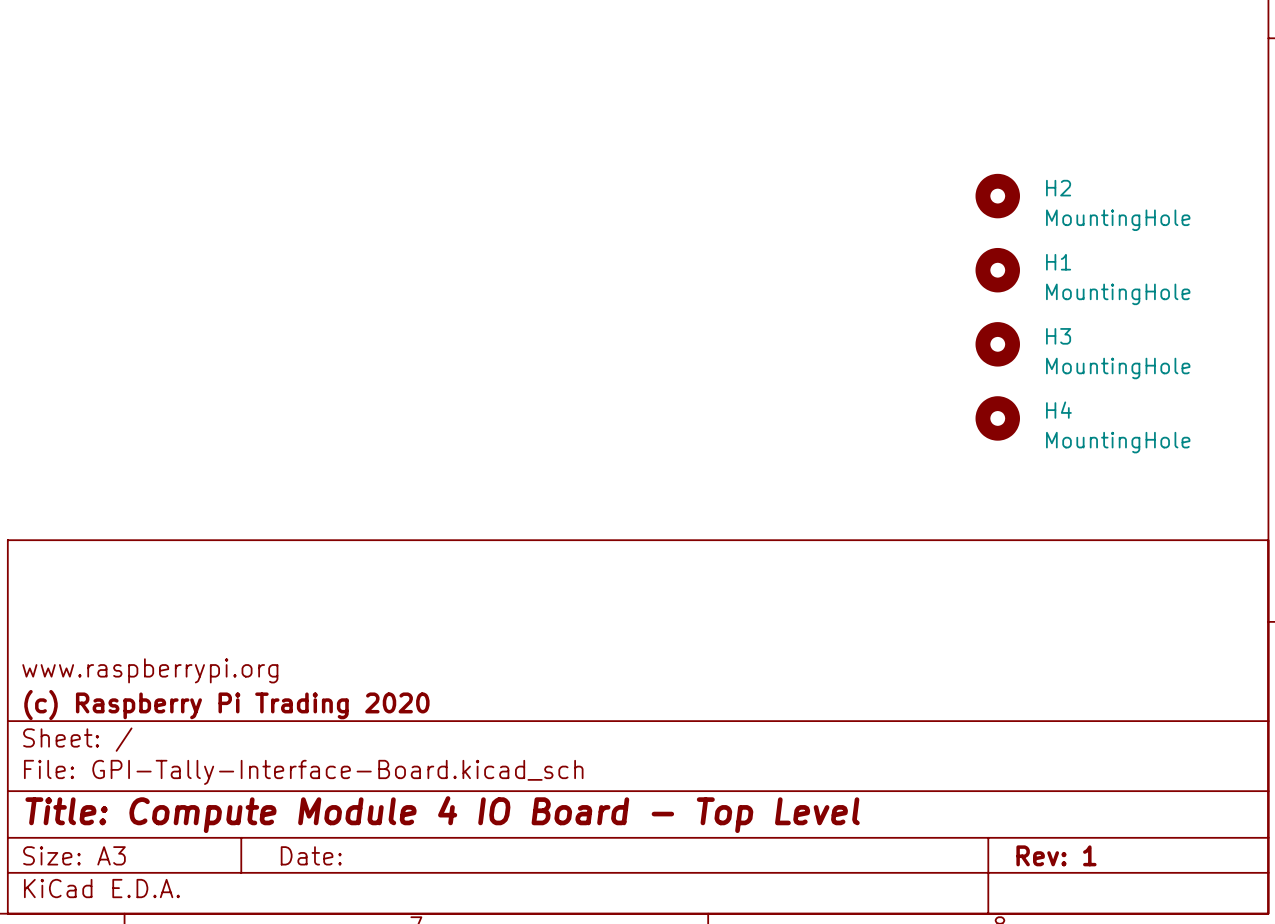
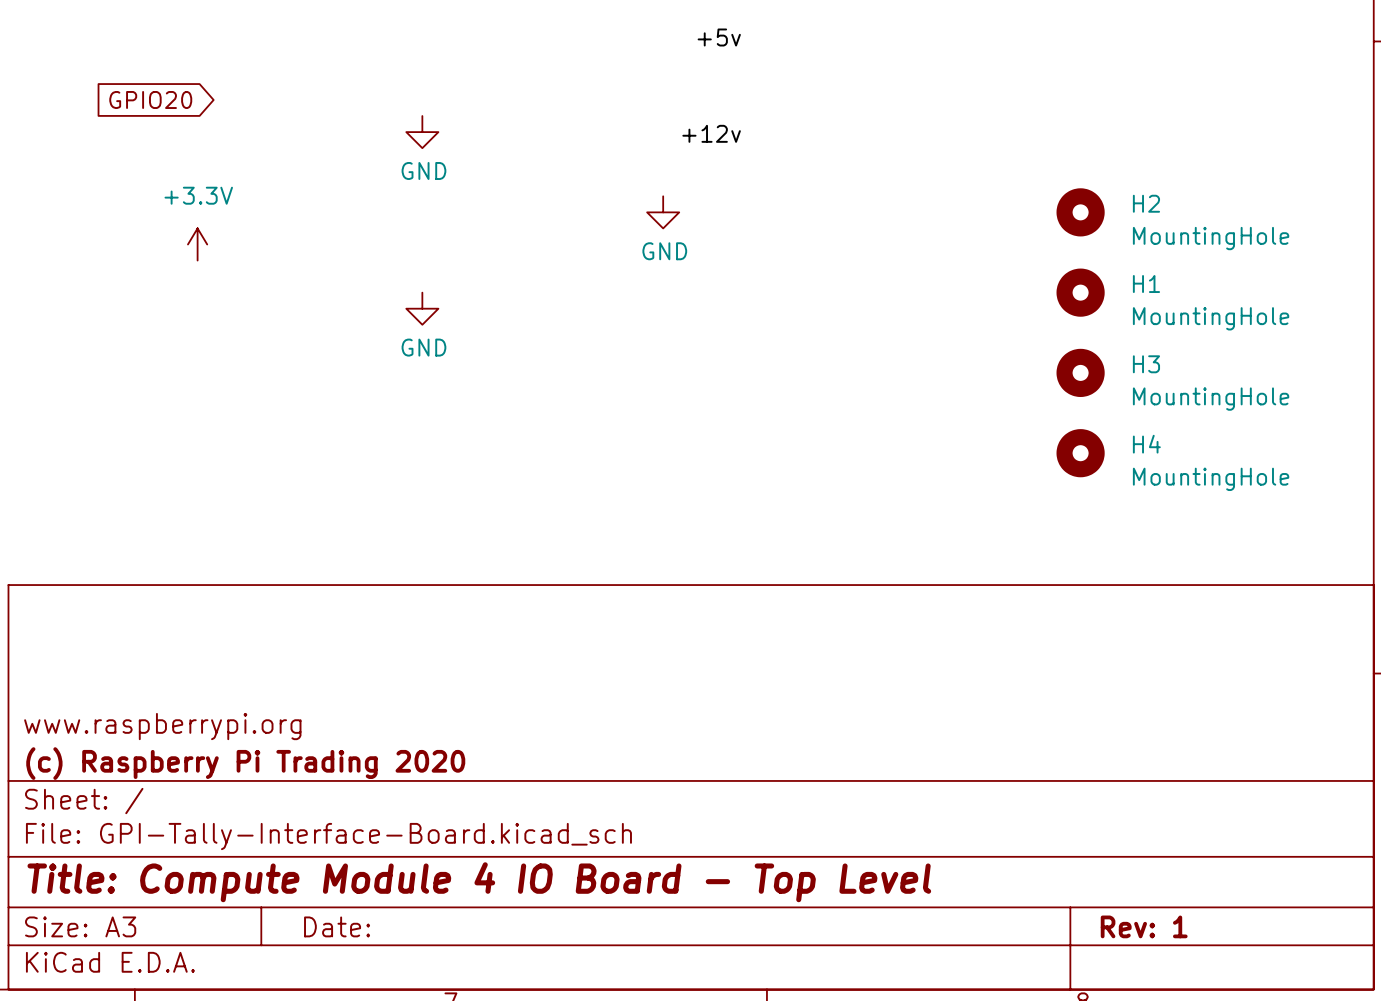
label: none -> +5v (719, 37)
global label: none -> GPIO20 (150, 99)
power symbol: none -> GND (422, 132)
label: none -> +12v (711, 133)
power symbol: none -> GND (663, 212)
power symbol: none -> +3.3V (197, 244)
power symbol: none -> GND (422, 308)

